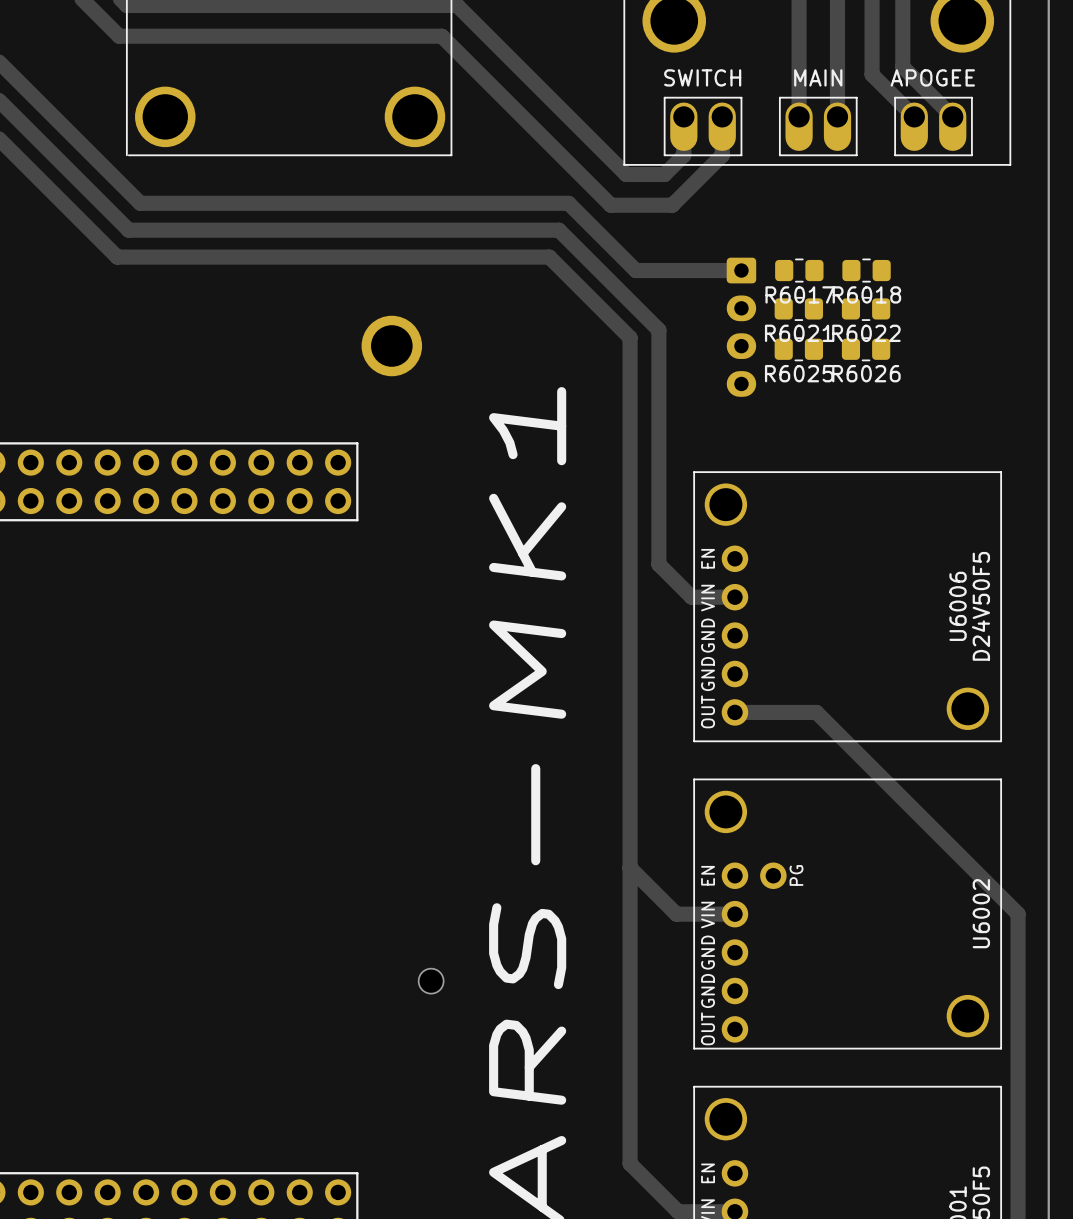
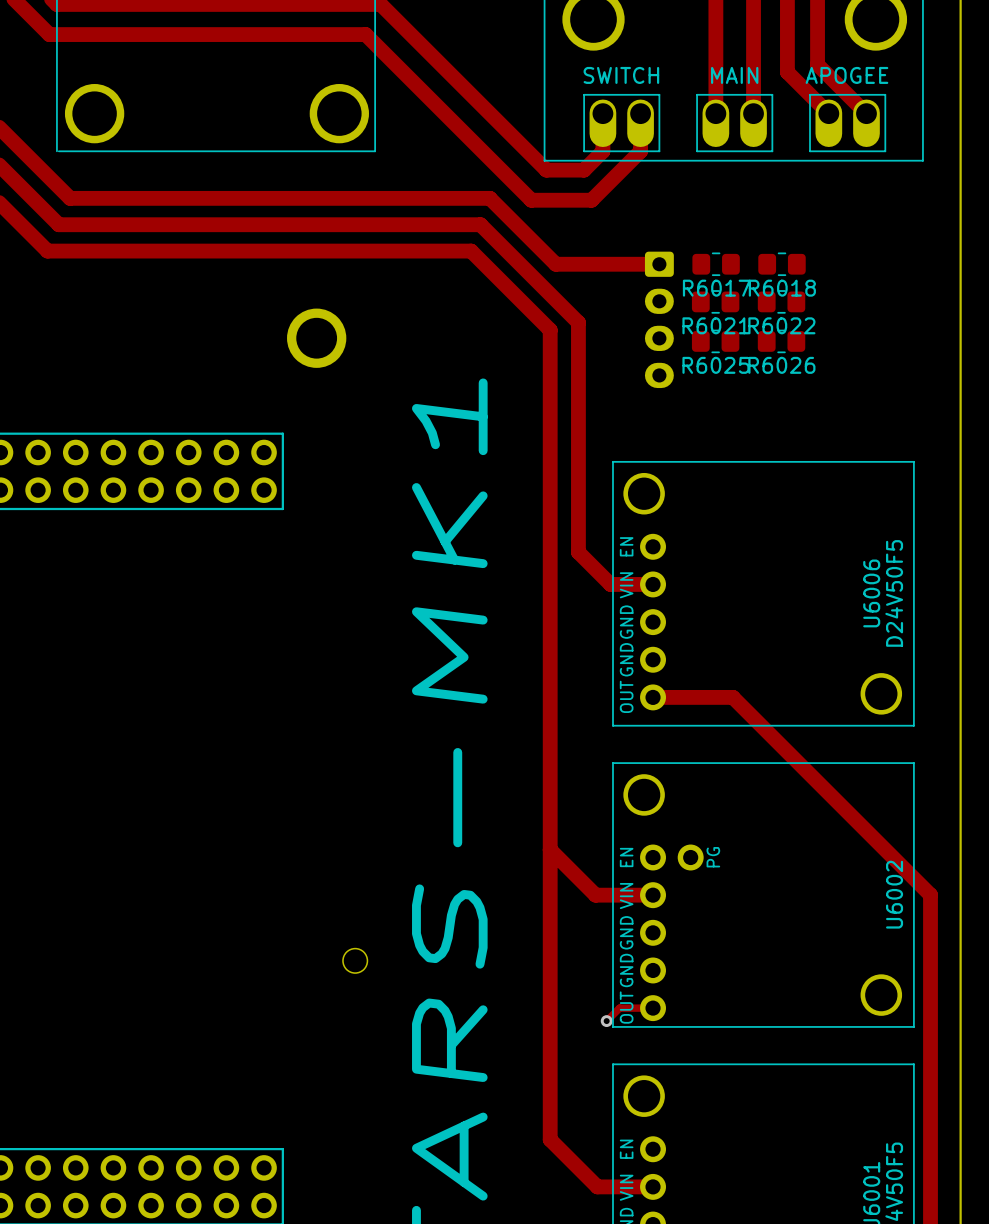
track: none -> (653, 1008) (619, 1008) (606, 1021)
via: none -> (606, 1021)

